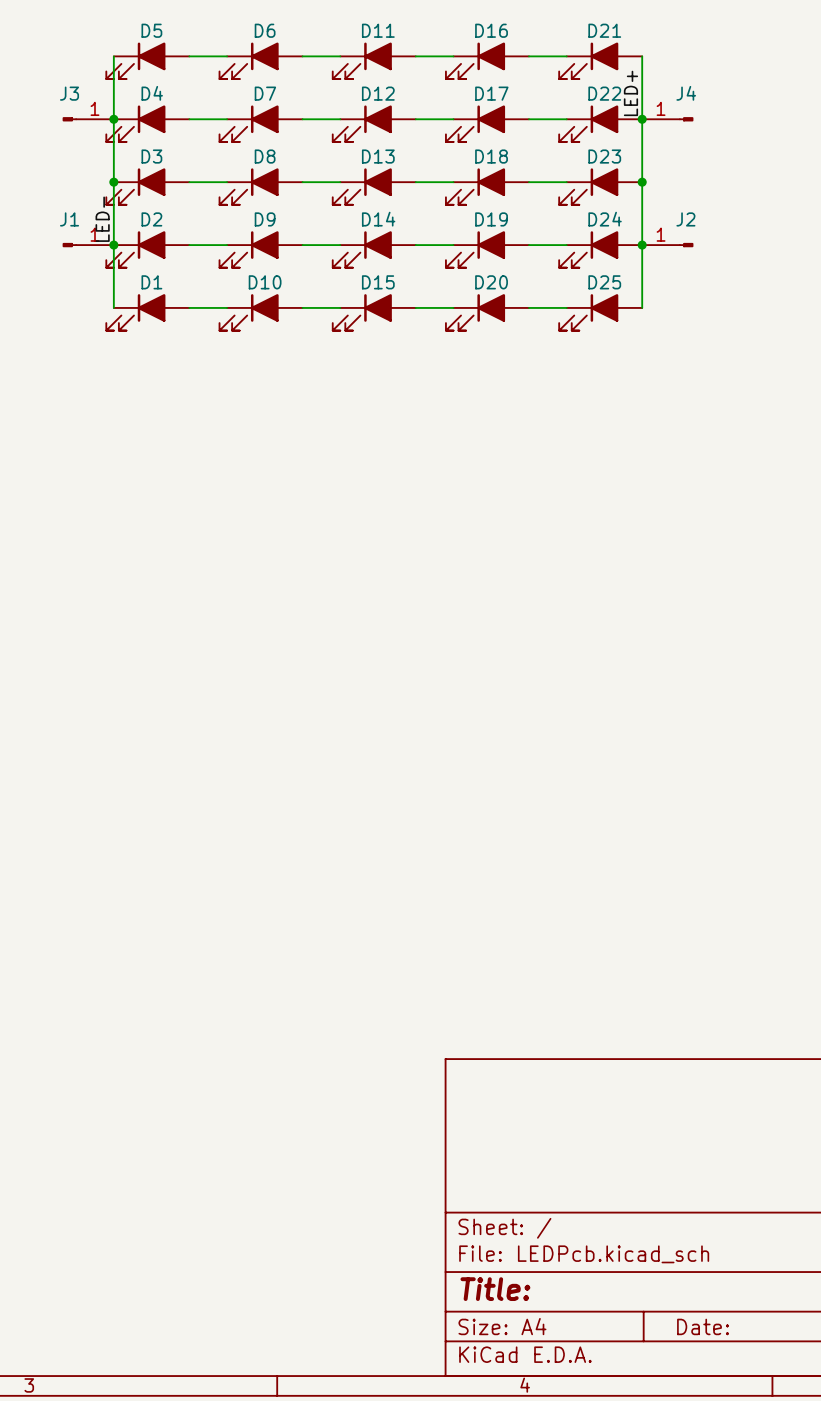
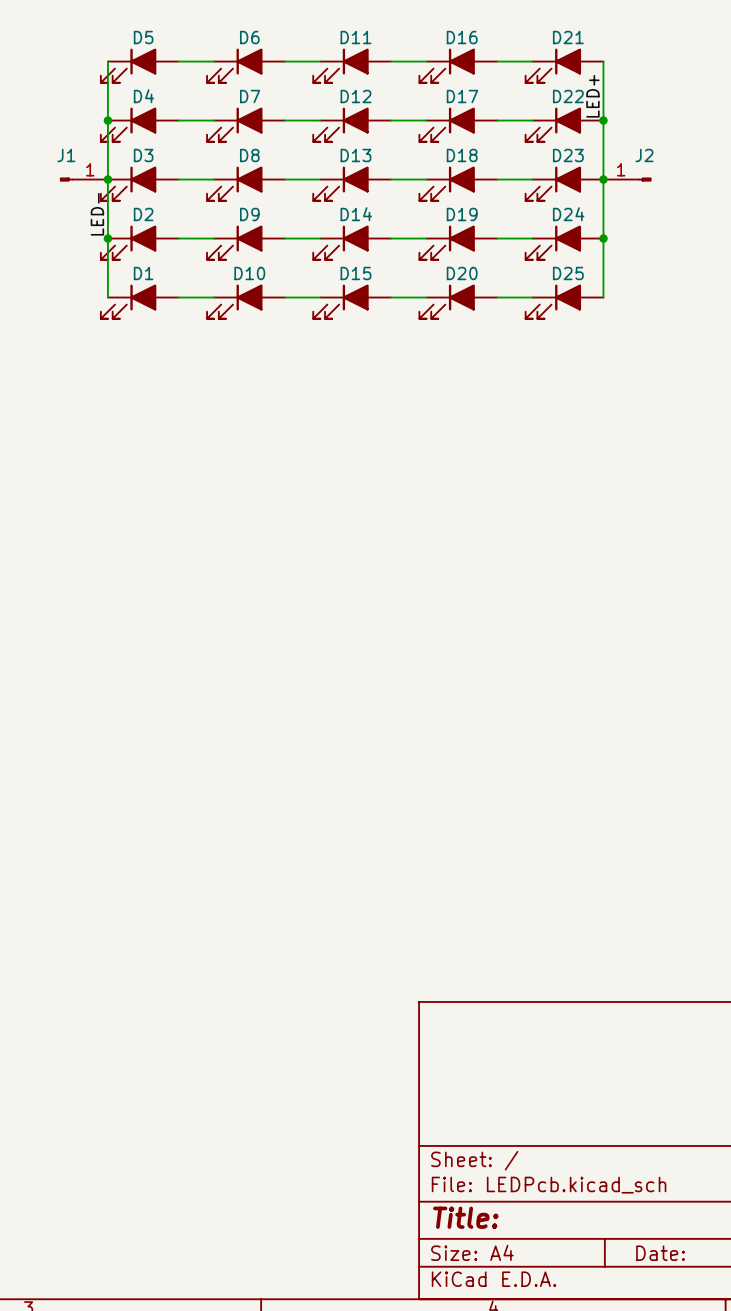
J3: (88, 119) -> none
J4: (667, 119) -> none
J1 position: (88, 245) -> (83, 179)
J2 position: (667, 245) -> (627, 179)

